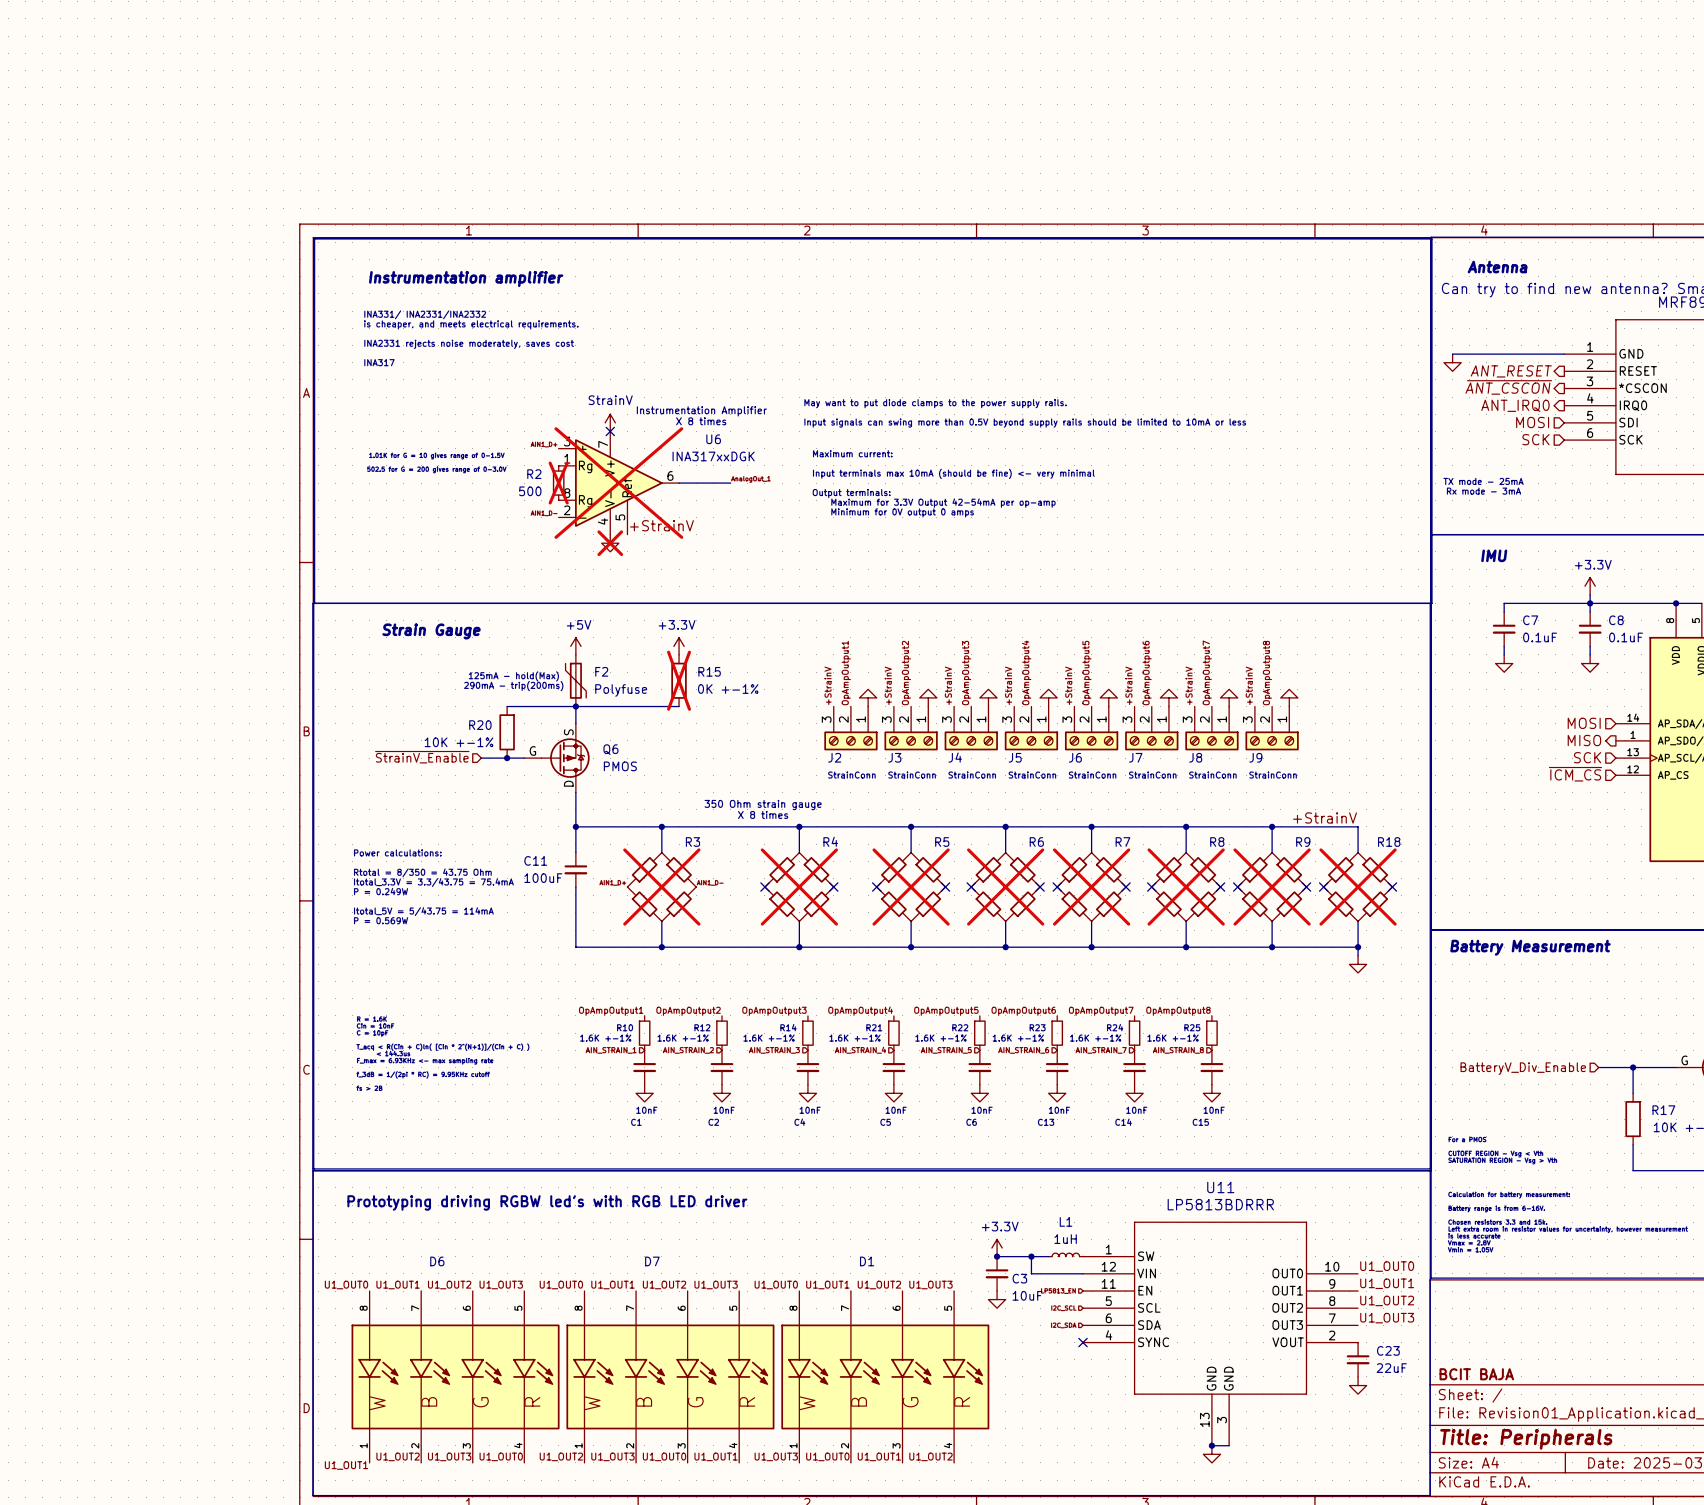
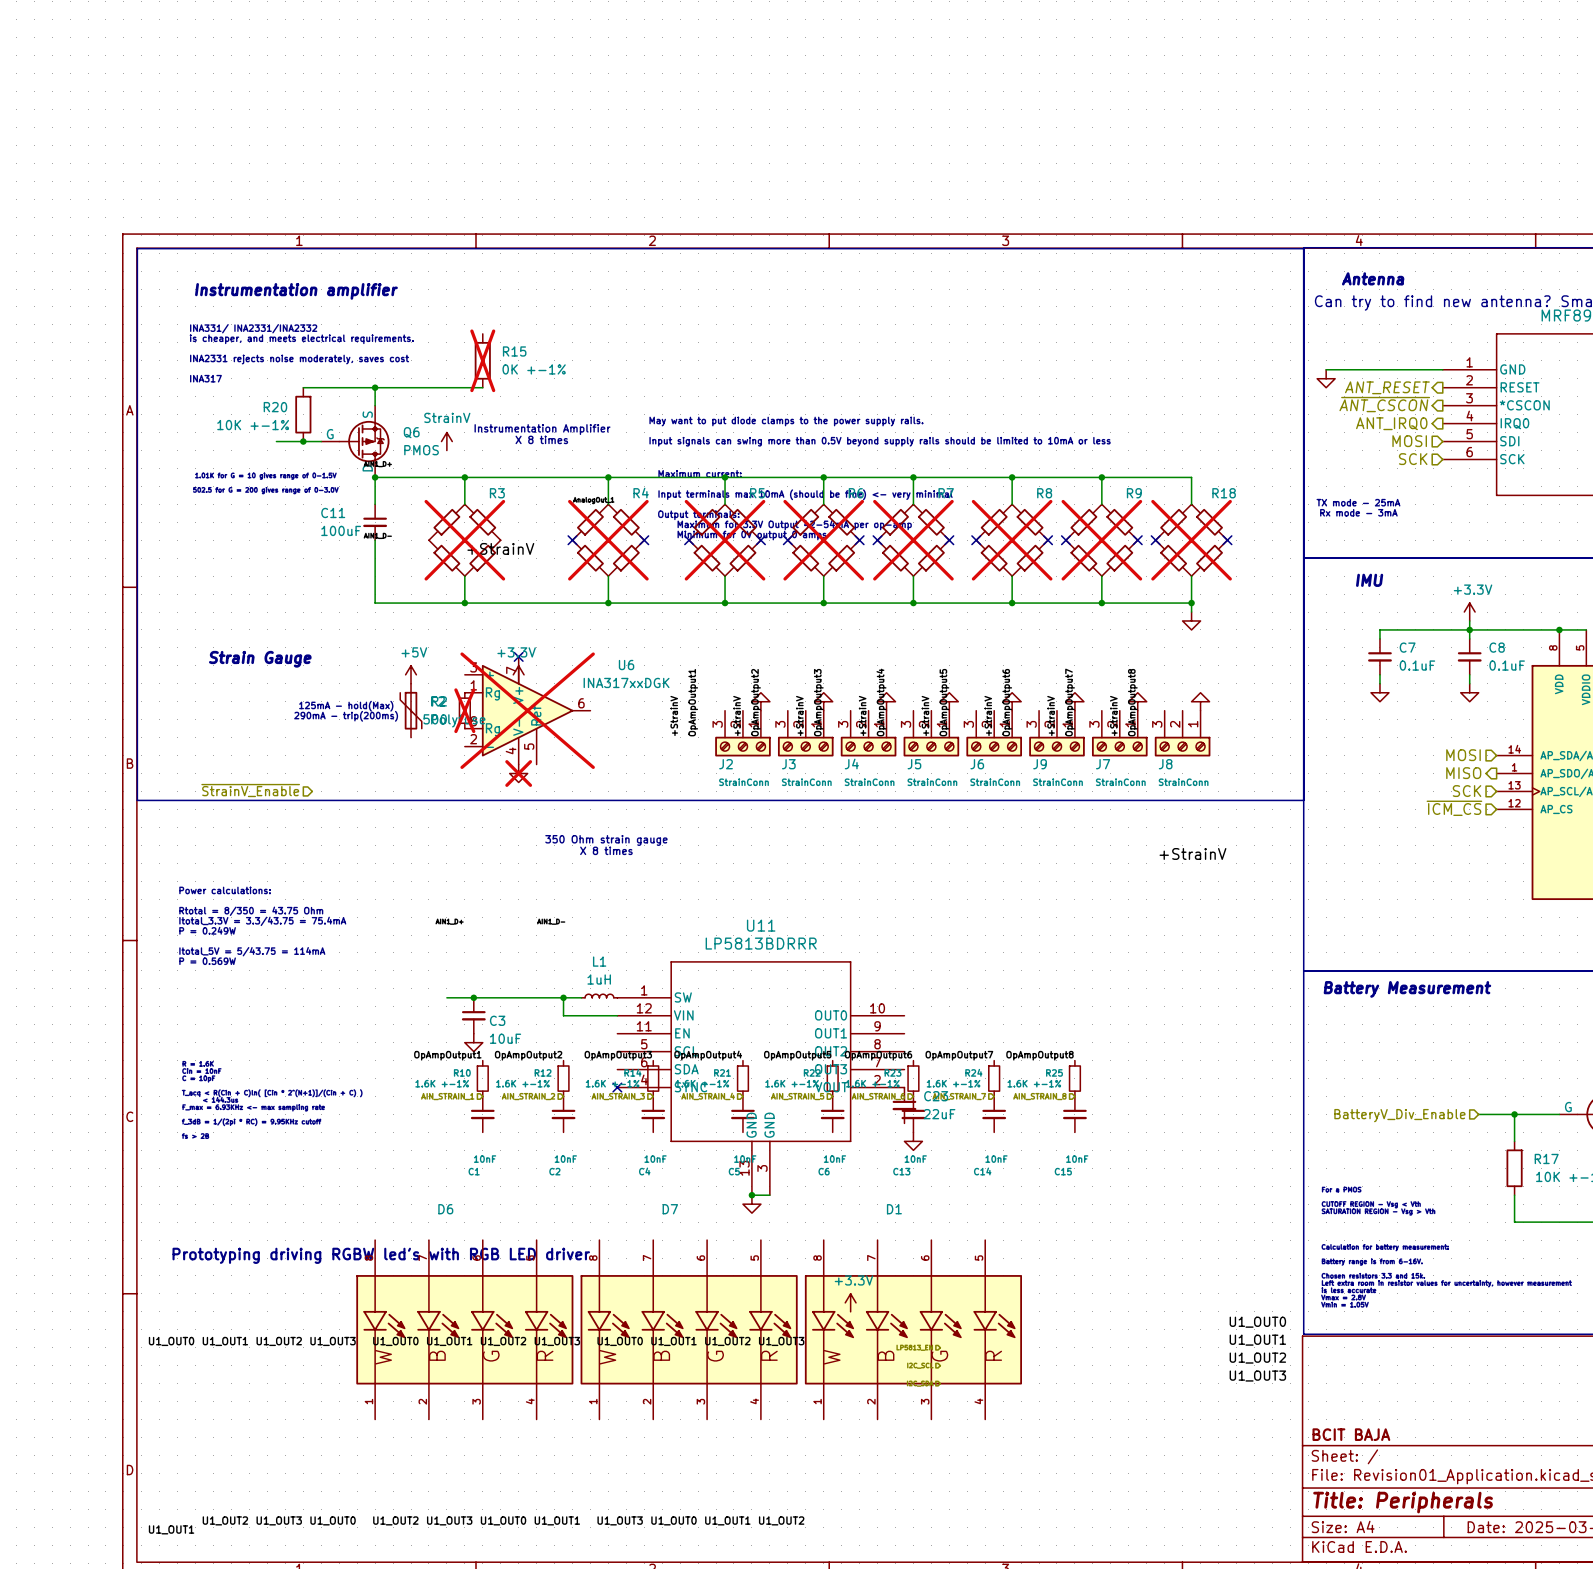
wire: none -> (303, 387) (482, 387)
wire: none -> (375, 387) (375, 405)
junction: none -> (375, 387)
wire: none -> (276, 441) (321, 441)
junction: none -> (303, 441)
no-connect mark: (610, 431) -> none
junction: none -> (375, 477)
junction: none -> (464, 477)
wire: none -> (608, 477) (608, 504)
junction: none -> (608, 477)
wire: none -> (725, 477) (725, 504)
junction: none -> (725, 477)
wire: none -> (823, 477) (823, 504)
junction: none -> (823, 477)
wire: none -> (913, 477) (913, 504)
junction: none -> (913, 477)
wire: none -> (1012, 477) (1012, 504)
junction: none -> (1012, 477)
wire: none -> (1101, 477) (1101, 504)
junction: none -> (1101, 477)
wire: none -> (375, 504) (375, 477) (1191, 477) (1191, 504)
R2 position: (558, 483) -> (464, 710)
U6 position: (618, 483) -> (527, 710)
wire: (679, 483) (730, 483) -> none
wire: none -> (375, 540) (375, 603) (1191, 603)
no-connect mark: none -> (572, 540)
no-connect mark: none -> (644, 540)
no-connect mark: none -> (689, 540)
no-connect mark: none -> (760, 540)
no-connect mark: none -> (787, 540)
no-connect mark: none -> (859, 540)
no-connect mark: none -> (877, 540)
no-connect mark: none -> (949, 540)
no-connect mark: none -> (976, 540)
no-connect mark: none -> (1048, 540)
no-connect mark: none -> (1065, 540)
no-connect mark: none -> (1137, 540)
no-connect mark: none -> (1155, 540)
no-connect mark: none -> (1227, 540)
power symbol: (610, 543) -> none
wire: none -> (464, 576) (464, 603)
wire: none -> (608, 576) (608, 603)
wire: none -> (725, 576) (725, 603)
wire: none -> (823, 576) (823, 603)
wire: none -> (913, 576) (913, 603)
wire: none -> (1012, 576) (1012, 603)
wire: none -> (1101, 576) (1101, 603)
wire: none -> (1191, 576) (1191, 612)
junction: none -> (464, 603)
junction: none -> (608, 603)
junction: none -> (725, 603)
junction: none -> (823, 603)
junction: none -> (913, 603)
junction: none -> (1012, 603)
junction: none -> (1101, 603)
junction: none -> (1191, 603)
power symbol: none -> (1191, 620)
line: (314, 603) (314, 238) (1431, 238) (1431, 603) (312, 603) (312, 1168) (1430, 1168) (1430, 603) -> none
no-connect mark: none -> (518, 656)
power symbol: none -> (760, 701)
power symbol: none -> (823, 701)
power symbol: none -> (886, 701)
power symbol: none -> (949, 701)
power symbol: none -> (1012, 701)
power symbol: none -> (1074, 701)
power symbol: none -> (1137, 701)
power symbol: none -> (1200, 701)
R15 position: (679, 680) -> (482, 360)
power symbol: (868, 697) -> none
power symbol: (928, 697) -> none
power symbol: (988, 697) -> none
power symbol: (1048, 697) -> none
power symbol: (1108, 697) -> none
power symbol: (1168, 697) -> none
power symbol: (1229, 697) -> none
power symbol: (1289, 697) -> none
wire: (507, 706) (679, 706) -> none
wire: (575, 706) (575, 723) -> none
junction: (575, 706) -> none
J2 position: (850, 728) -> (742, 733)
J3 position: (911, 728) -> (805, 733)
J4 position: (971, 728) -> (868, 733)
J5 position: (1031, 728) -> (931, 733)
J6 position: (1091, 728) -> (994, 733)
J7 position: (1151, 728) -> (1119, 733)
J8 position: (1211, 728) -> (1182, 733)
J9 position: (1272, 728) -> (1056, 733)
R20 position: (507, 732) -> (303, 414)
power symbol: none -> (518, 773)
wire: (481, 758) (524, 758) -> none
junction: (507, 758) -> none
Q6 position: (556, 758) -> (355, 441)
line: (313, 766) (313, 1170) -> (137, 800) (1303, 800)
wire: (575, 792) (575, 852) -> none
wire: (575, 826) (1358, 826) (1358, 852) -> none
junction: (575, 826) -> none
wire: (661, 826) (661, 852) -> none
junction: (661, 826) -> none
wire: (799, 826) (799, 852) -> none
junction: (799, 826) -> none
wire: (911, 826) (911, 852) -> none
junction: (911, 826) -> none
wire: (1005, 826) (1005, 852) -> none
junction: (1005, 826) -> none
wire: (1091, 826) (1091, 852) -> none
junction: (1091, 826) -> none
wire: (1186, 826) (1186, 852) -> none
junction: (1186, 826) -> none
wire: (1272, 826) (1272, 852) -> none
junction: (1272, 826) -> none
C11 position: (575, 869) -> (375, 522)
wire: (575, 887) (575, 947) (1358, 947) -> none
R3 position: (661, 887) -> (464, 540)
no-connect mark: (764, 887) -> none
R4 position: (799, 887) -> (608, 540)
no-connect mark: (833, 887) -> none
no-connect mark: (876, 887) -> none
R5 position: (911, 887) -> (725, 540)
no-connect mark: (945, 887) -> none
no-connect mark: (971, 887) -> none
R6 position: (1005, 887) -> (823, 540)
no-connect mark: (1040, 887) -> none
no-connect mark: (1057, 887) -> none
R7 position: (1091, 887) -> (913, 540)
no-connect mark: (1125, 887) -> none
no-connect mark: (1151, 887) -> none
R8 position: (1186, 887) -> (1012, 540)
no-connect mark: (1220, 887) -> none
no-connect mark: (1237, 887) -> none
R9 position: (1272, 887) -> (1101, 540)
no-connect mark: (1306, 887) -> none
no-connect mark: (1323, 887) -> none
R18 position: (1358, 887) -> (1191, 540)
no-connect mark: (1392, 887) -> none
wire: (661, 921) (661, 947) -> none
wire: (799, 921) (799, 947) -> none
wire: (911, 921) (911, 947) -> none
wire: (1005, 921) (1005, 947) -> none
wire: (1091, 921) (1091, 947) -> none
wire: (1186, 921) (1186, 947) -> none
wire: (1272, 921) (1272, 947) -> none
wire: (1358, 921) (1358, 955) -> none
junction position: (661, 947) -> (473, 997)
junction: (799, 947) -> none
junction: (911, 947) -> none
junction: (1005, 947) -> none
junction: (1091, 947) -> none
junction: (1186, 947) -> none
junction: (1272, 947) -> none
junction: (1358, 947) -> none
wire: none -> (446, 997) (581, 997)
wire: none -> (563, 997) (563, 1015) (617, 1015)
junction: none -> (563, 997)
power symbol: (1358, 964) -> none
power symbol: none -> (473, 1042)
no-connect mark: none -> (617, 1087)
power symbol: (644, 1093) -> none
power symbol: (722, 1093) -> none
power symbol: (807, 1093) -> none
power symbol: (893, 1093) -> none
power symbol: (979, 1093) -> none
power symbol: (1134, 1093) -> none
power symbol: (1211, 1093) -> none
wire: none -> (751, 1195) (769, 1195)
junction: none -> (751, 1195)
power symbol: none -> (751, 1204)
line: (1430, 1170) (1430, 1495) (312, 1495) (312, 1170) (1431, 1170) -> none
L1 position: (1065, 1254) -> (599, 996)
junction: (997, 1256) -> none
junction: (1031, 1256) -> none
C3 position: (997, 1273) -> (473, 1015)
power symbol: (997, 1299) -> none
U11 position: (1220, 1333) -> (760, 1078)
no-connect mark: (1083, 1342) -> none
C23 position: (1358, 1359) -> (904, 1105)
D6 position: (455, 1376) -> (464, 1329)
D7 position: (670, 1376) -> (689, 1329)
D1 position: (885, 1376) -> (913, 1329)
power symbol: (1358, 1385) -> none
wire: (1211, 1445) (1229, 1445) -> none
junction: (1211, 1445) -> none
power symbol: (1211, 1454) -> none

